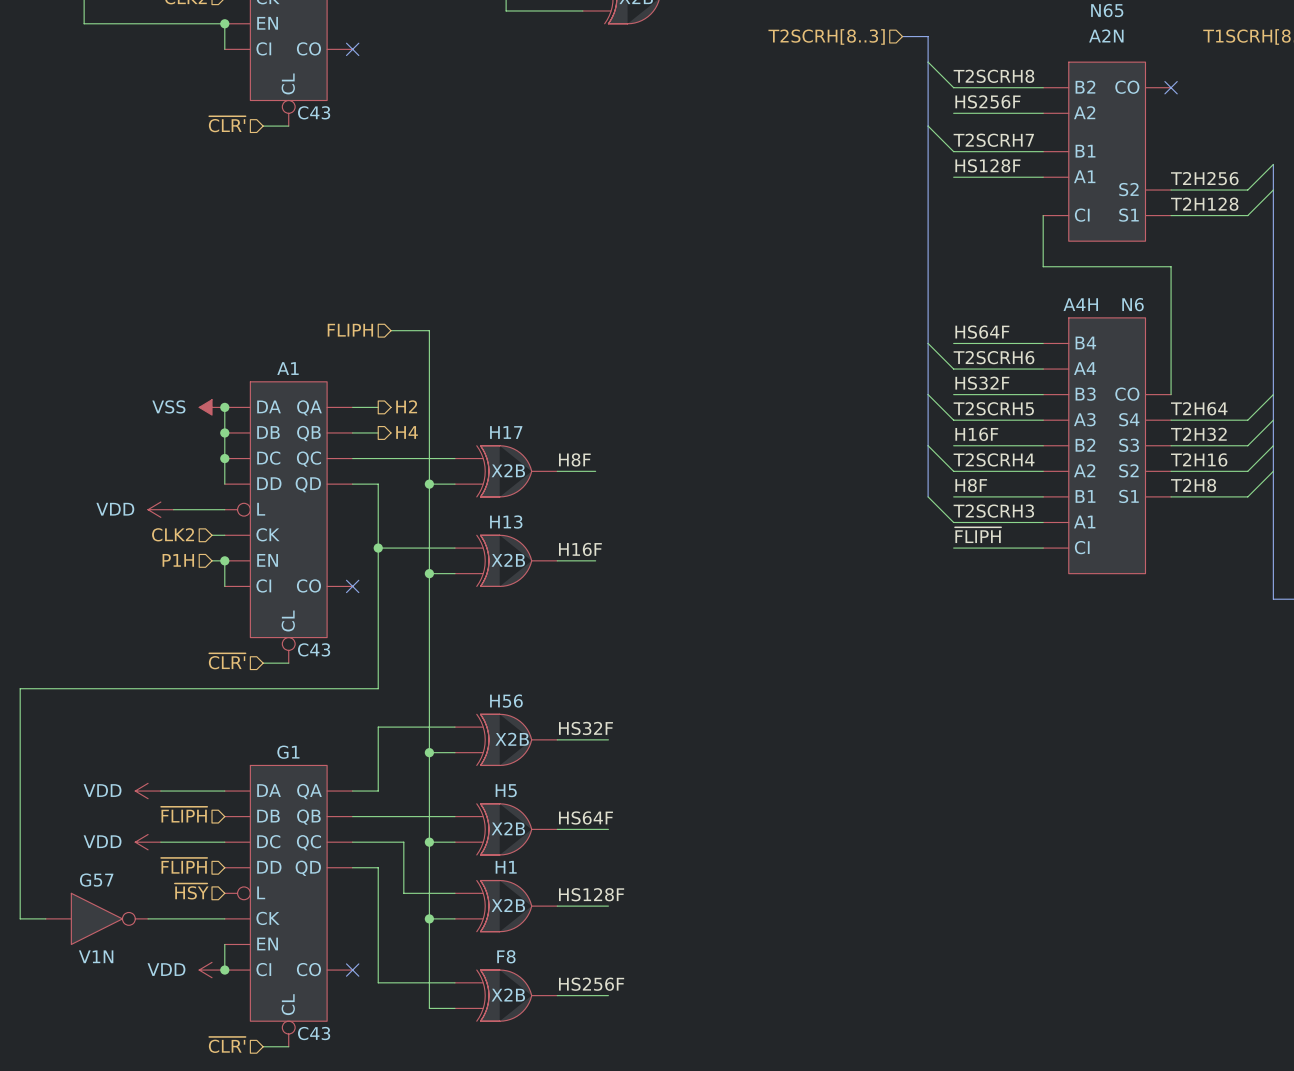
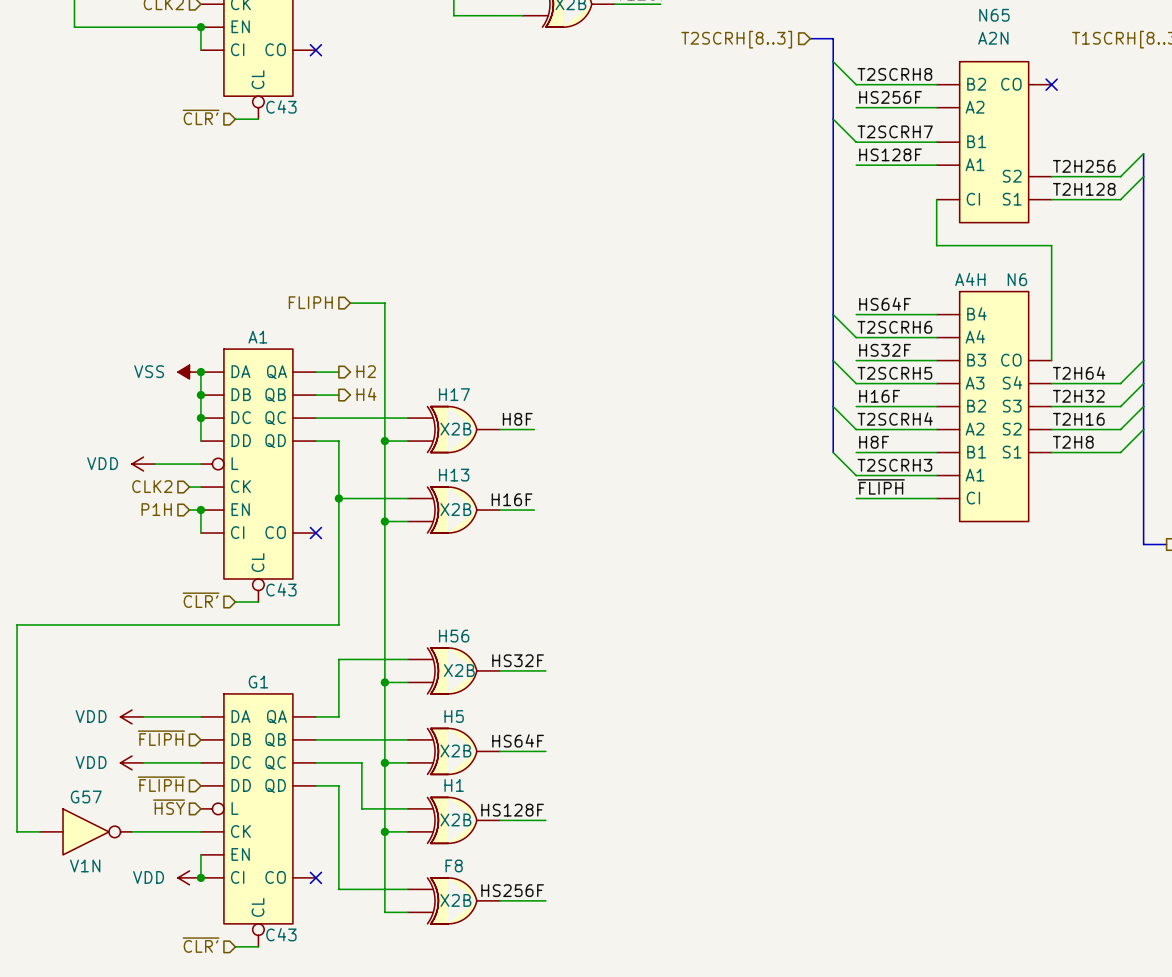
label position: H16F (580, 549) -> H16F (512, 499)
label position: HS32F (585, 728) -> HS32F (518, 660)
label position: HS64F (585, 817) -> HS64F (518, 740)
label position: HS128F (591, 894) -> HS128F (512, 810)
label position: HS256F (591, 984) -> HS256F (512, 890)

